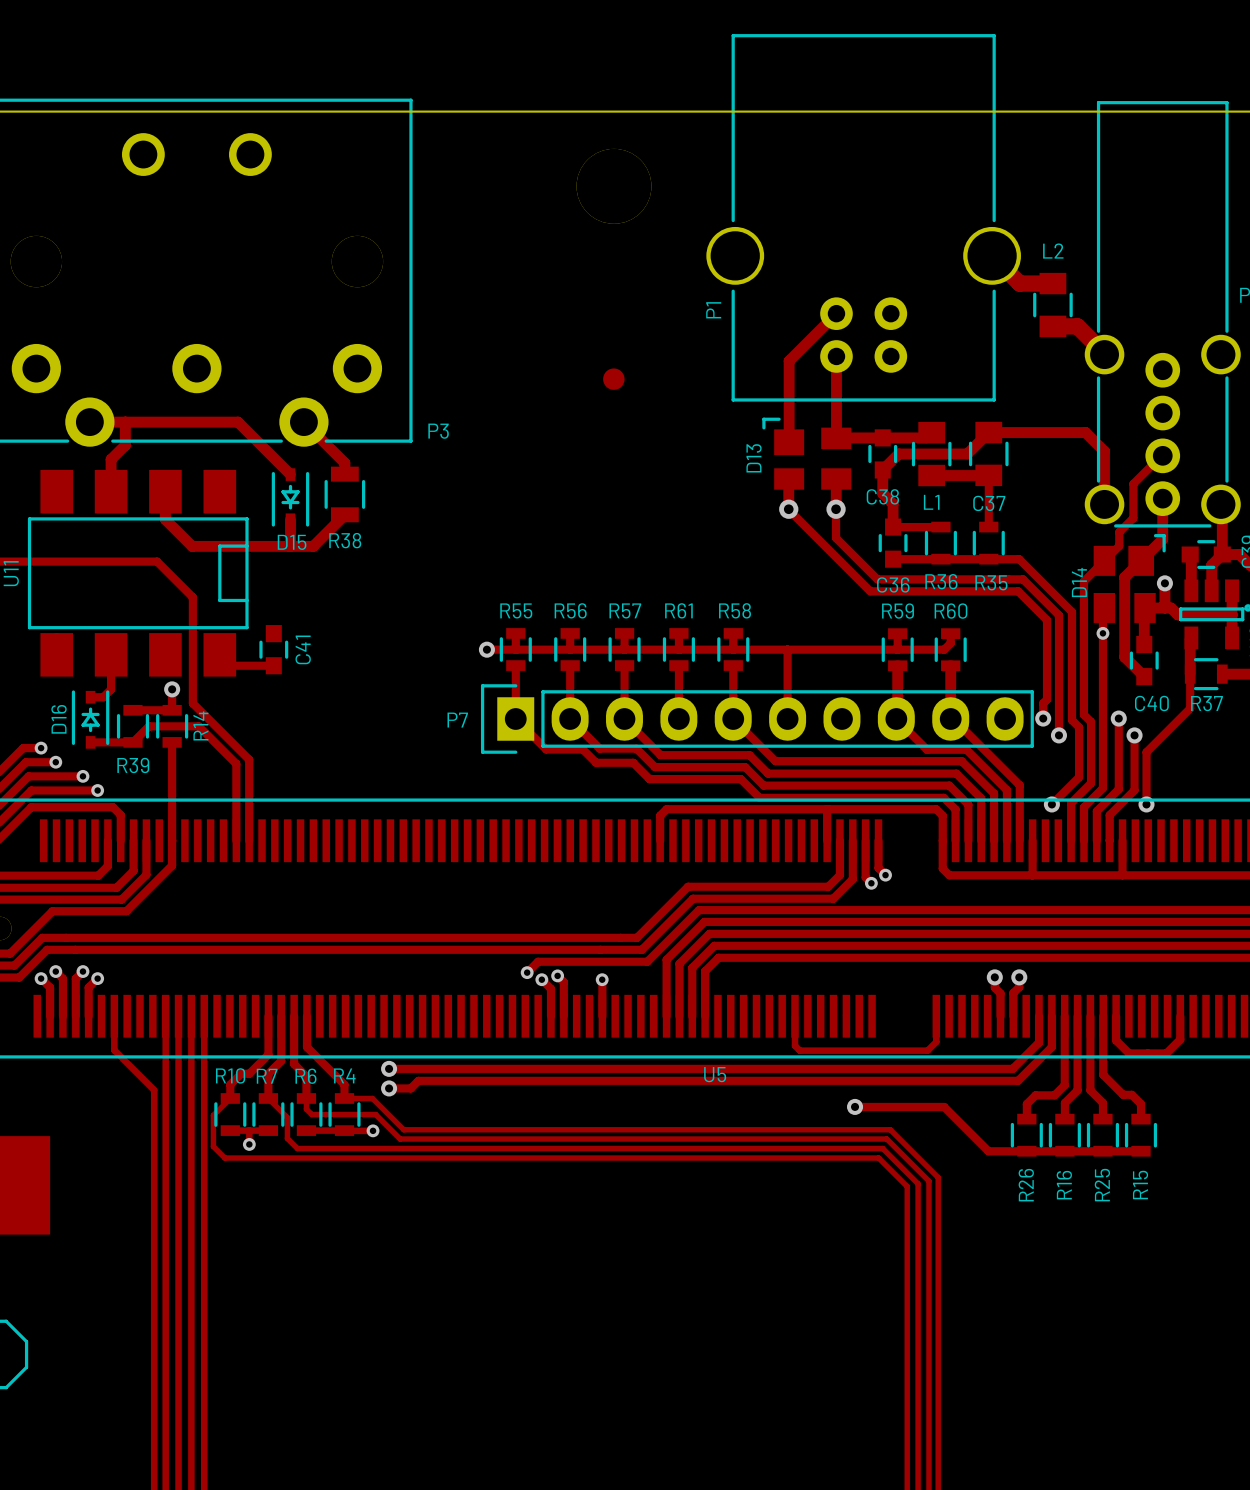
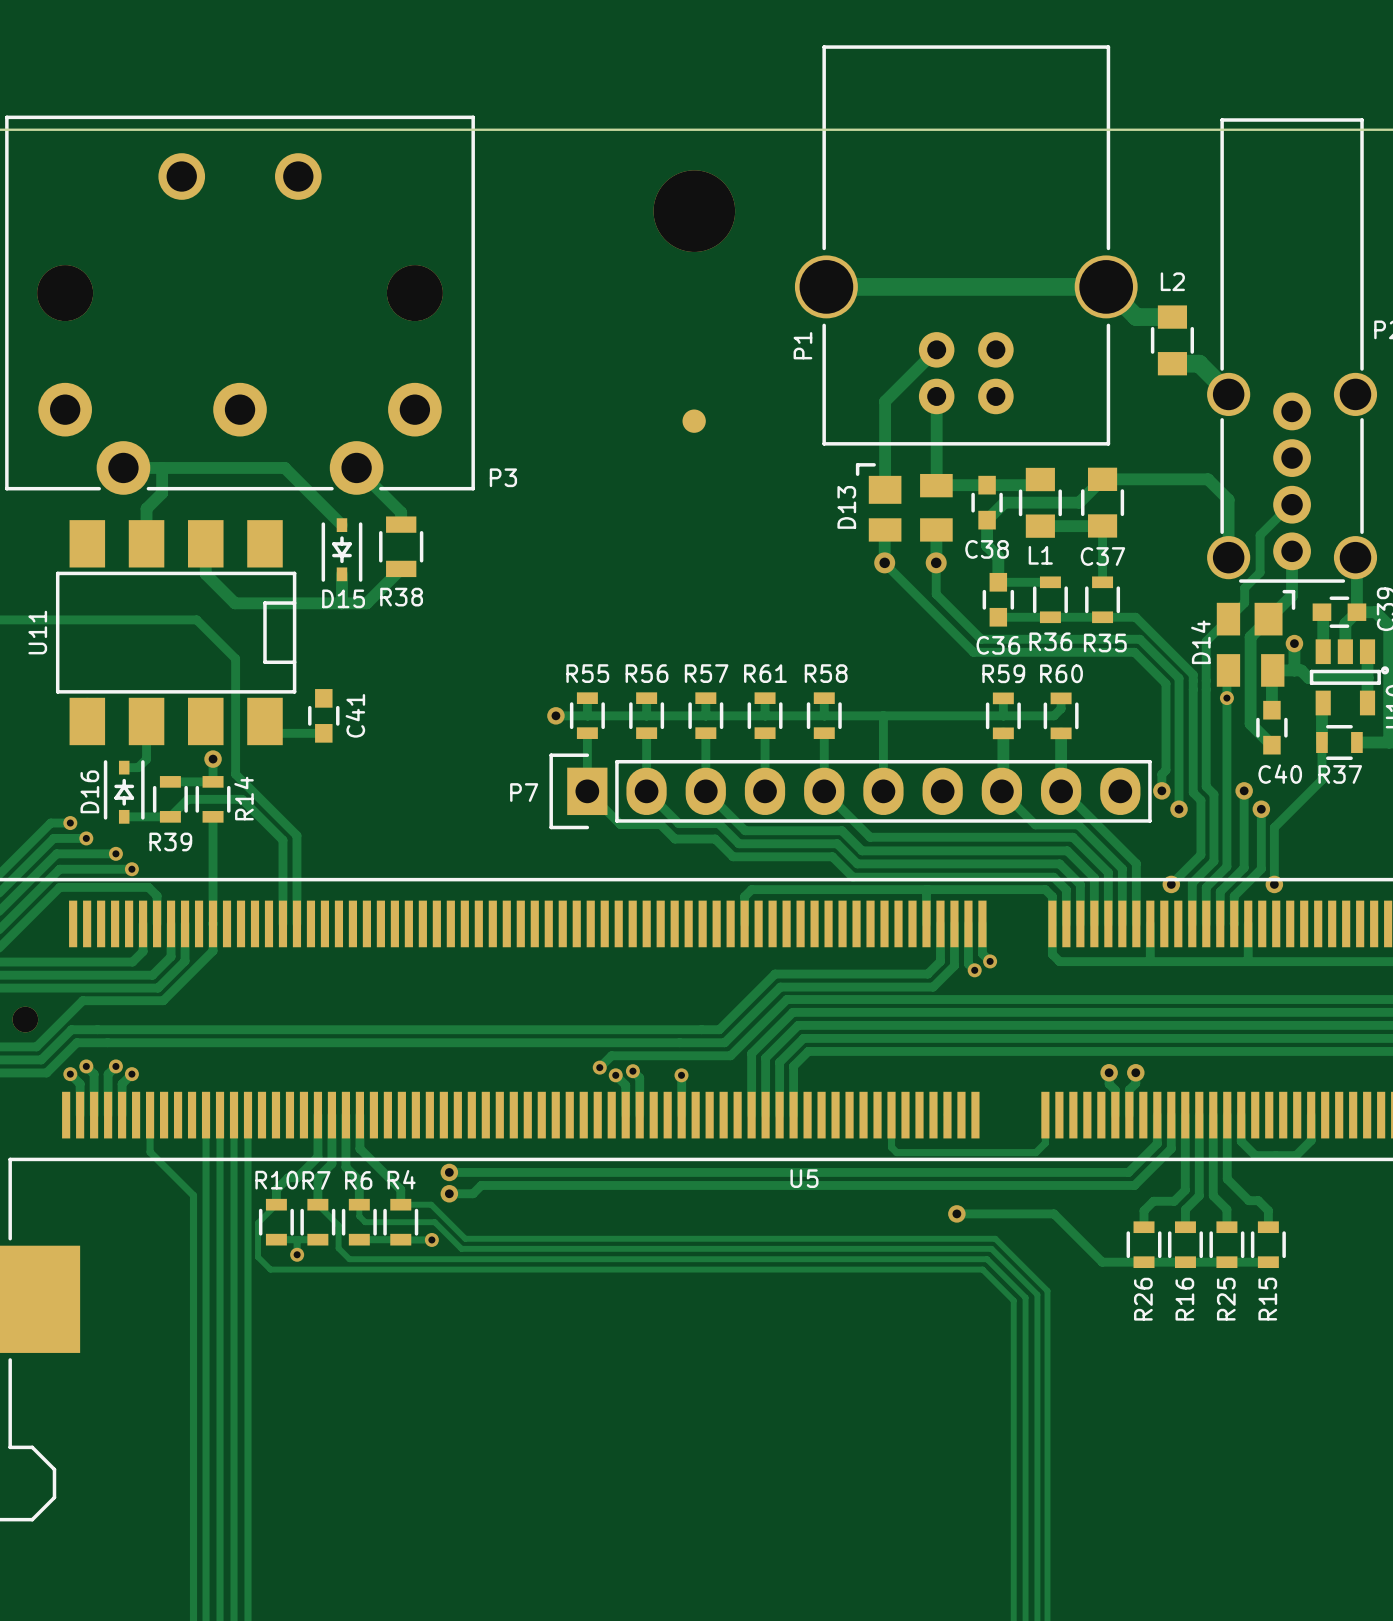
track: none -> (826, 286) (1106, 286)

